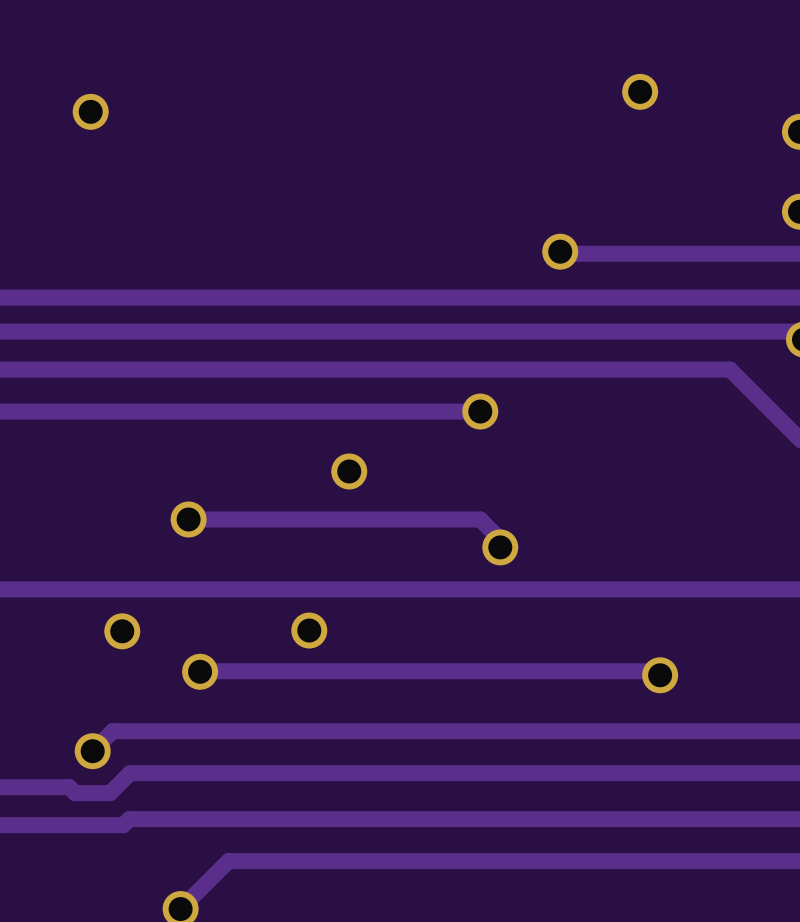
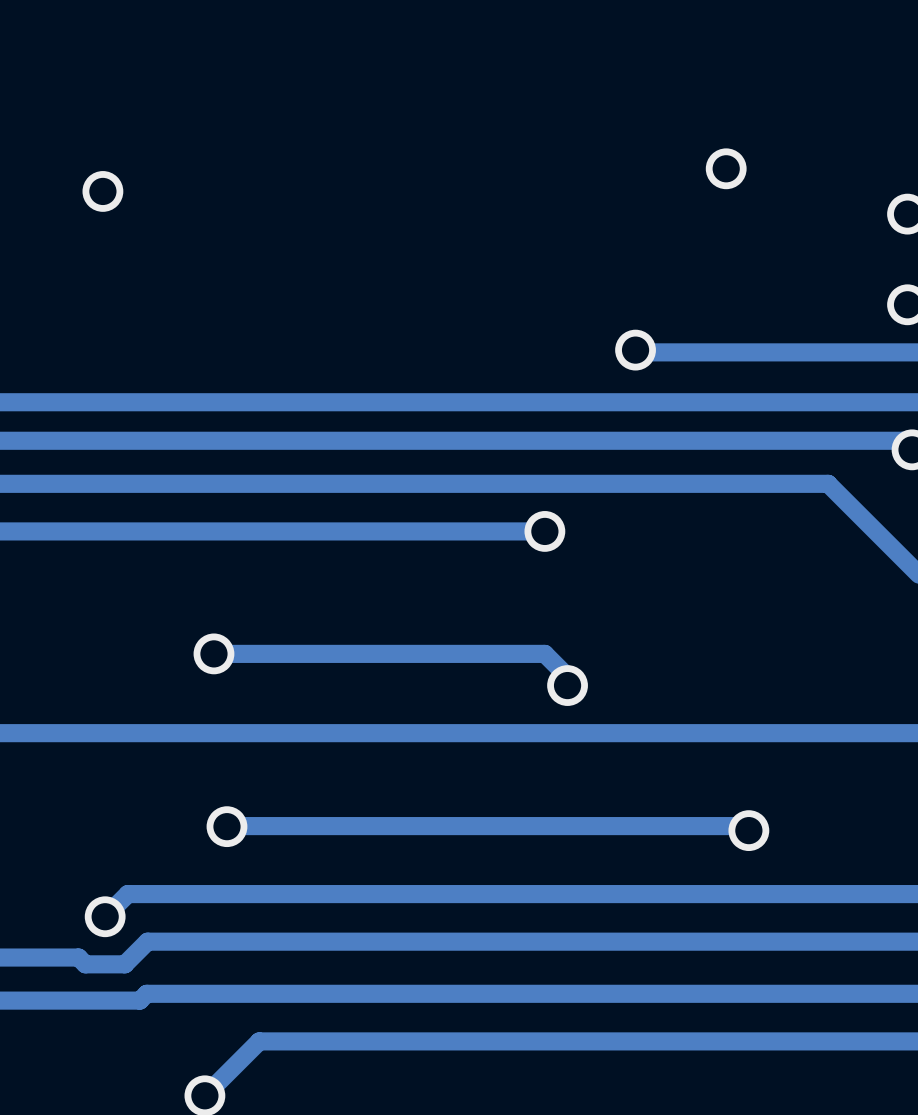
via: (349, 471) -> none
via: (309, 630) -> none
via: (122, 631) -> none

